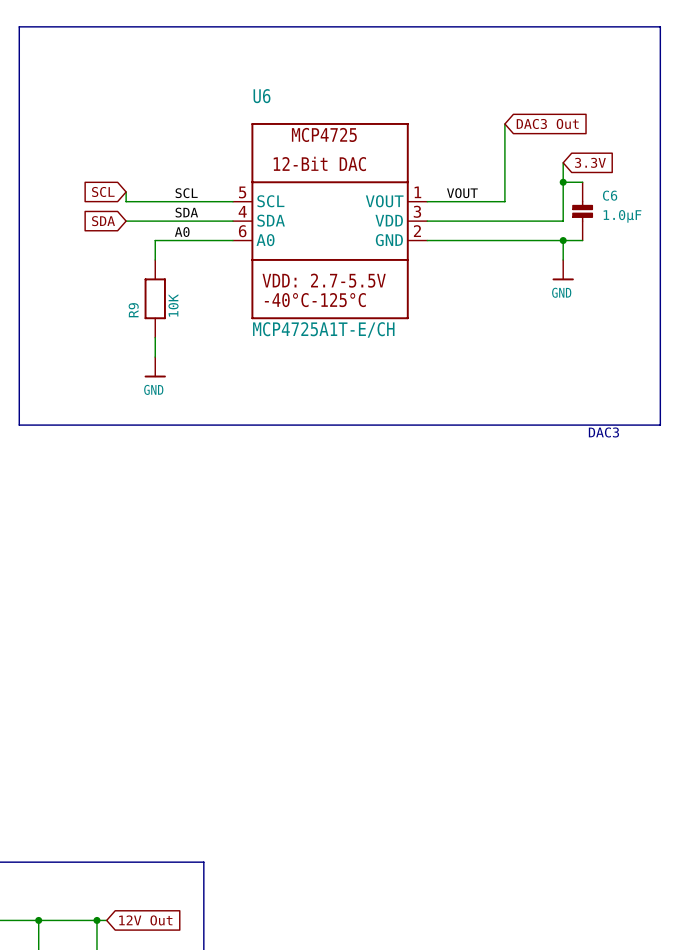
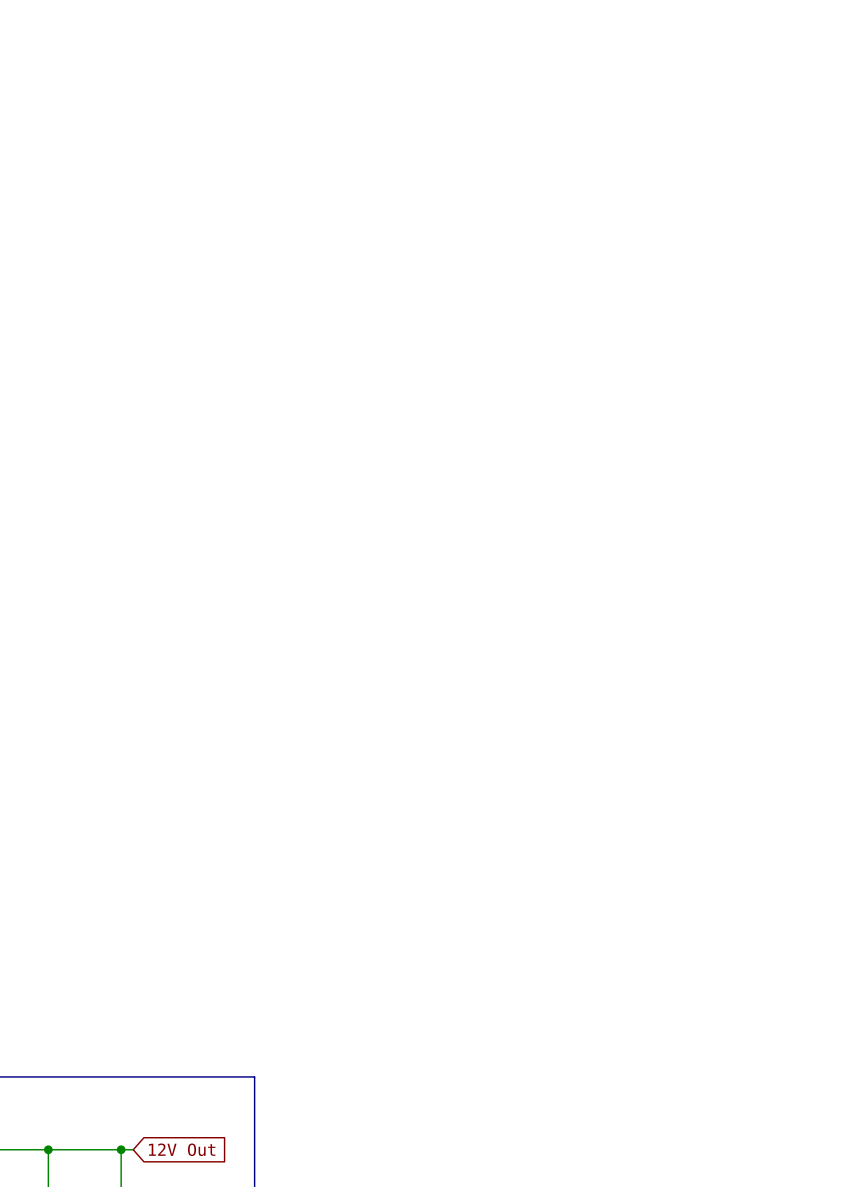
line: (19, 26) (660, 26) (660, 425) (19, 425) (19, 26) -> none
wire: (504, 123) (504, 201) (427, 201) -> none
global label: DAC3 Out (547, 123) -> none
wire: (563, 162) (563, 221) (427, 221) -> none
global label: 3.3V (590, 162) -> none
wire: (563, 182) (582, 182) -> none
junction: (563, 182) -> none
global label: SCL (103, 191) -> none
wire: (126, 191) (126, 201) (232, 201) -> none
label: SCL (186, 193) -> none
label: VOUT (462, 193) -> none
C6: 1.0µF (582, 211) -> none
label: SDA (186, 212) -> none
global label: SDA (103, 221) -> none
wire: (126, 221) (232, 221) -> none
U6: MCP4725A1T-E/CH (330, 221) -> none
label: A0 (182, 232) -> none
wire: (232, 240) (155, 240) (155, 259) -> none
wire: (427, 240) (582, 240) -> none
wire: (563, 240) (563, 259) -> none
junction: (563, 240) -> none
power symbol: GND (563, 270) -> none
R9: 10K (155, 298) -> none
wire: (155, 337) (155, 357) -> none
power symbol: GND (155, 367) -> none
text: DAC3 (603, 432) -> none

